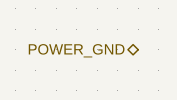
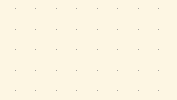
hierarchical label: POWER_GND (76, 50) -> none

